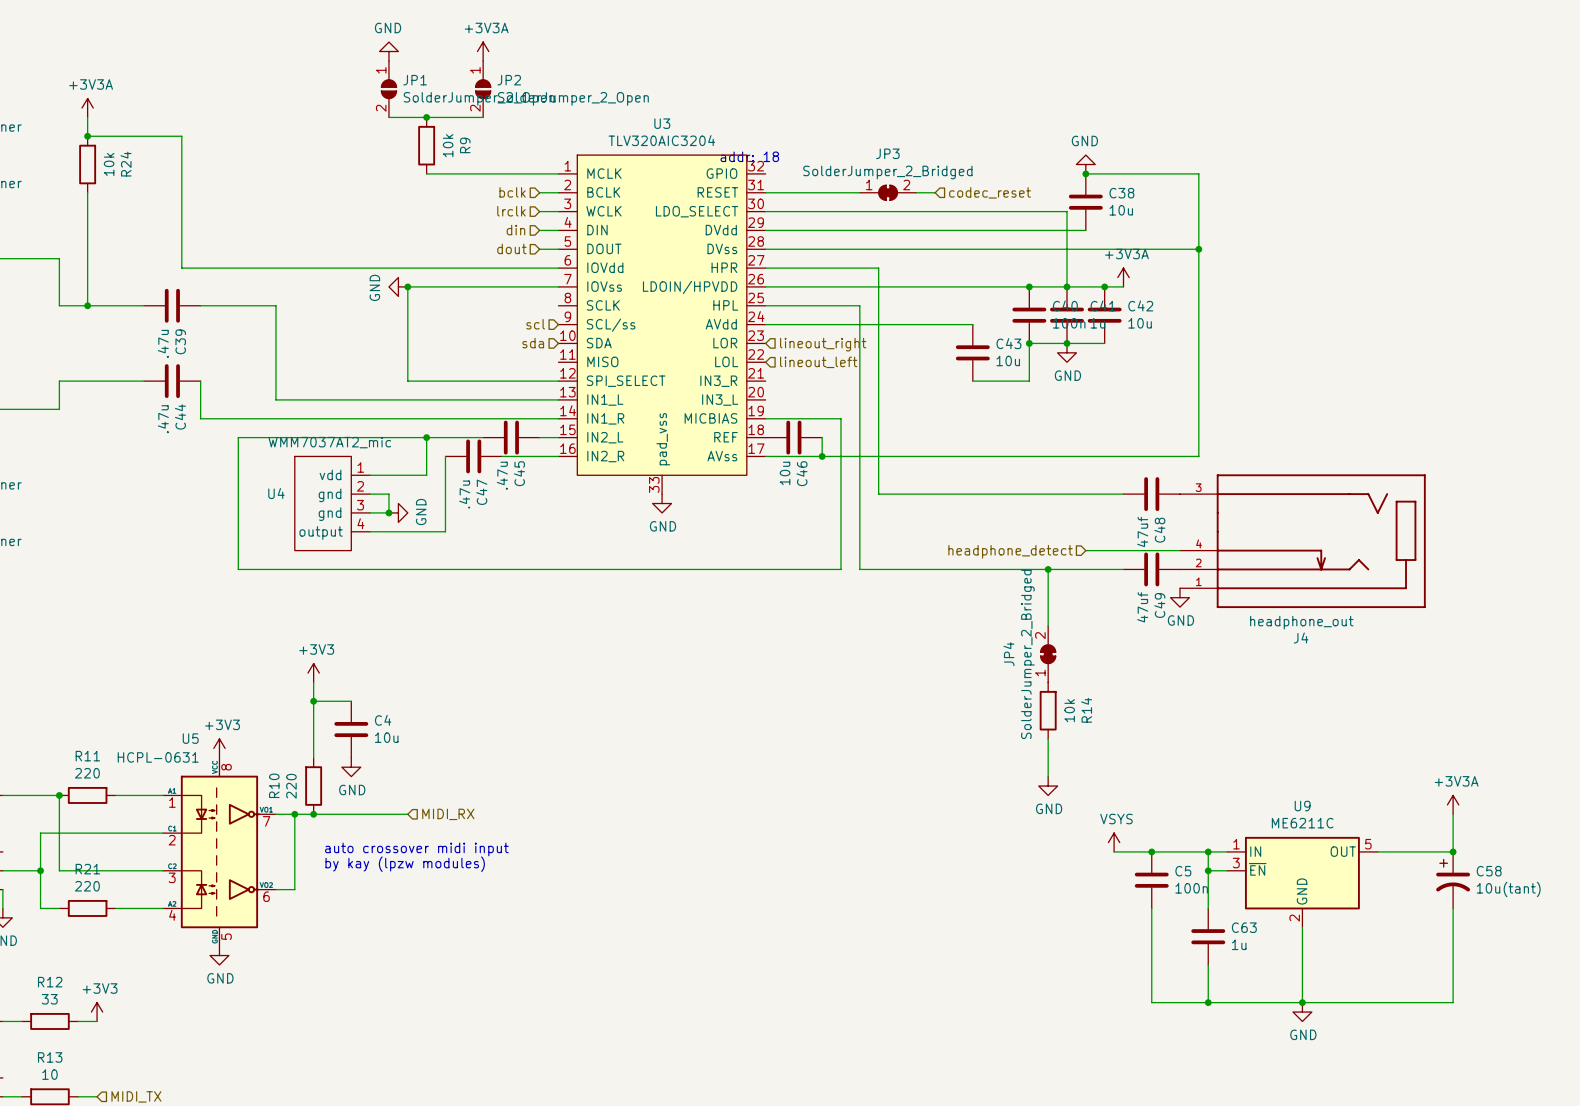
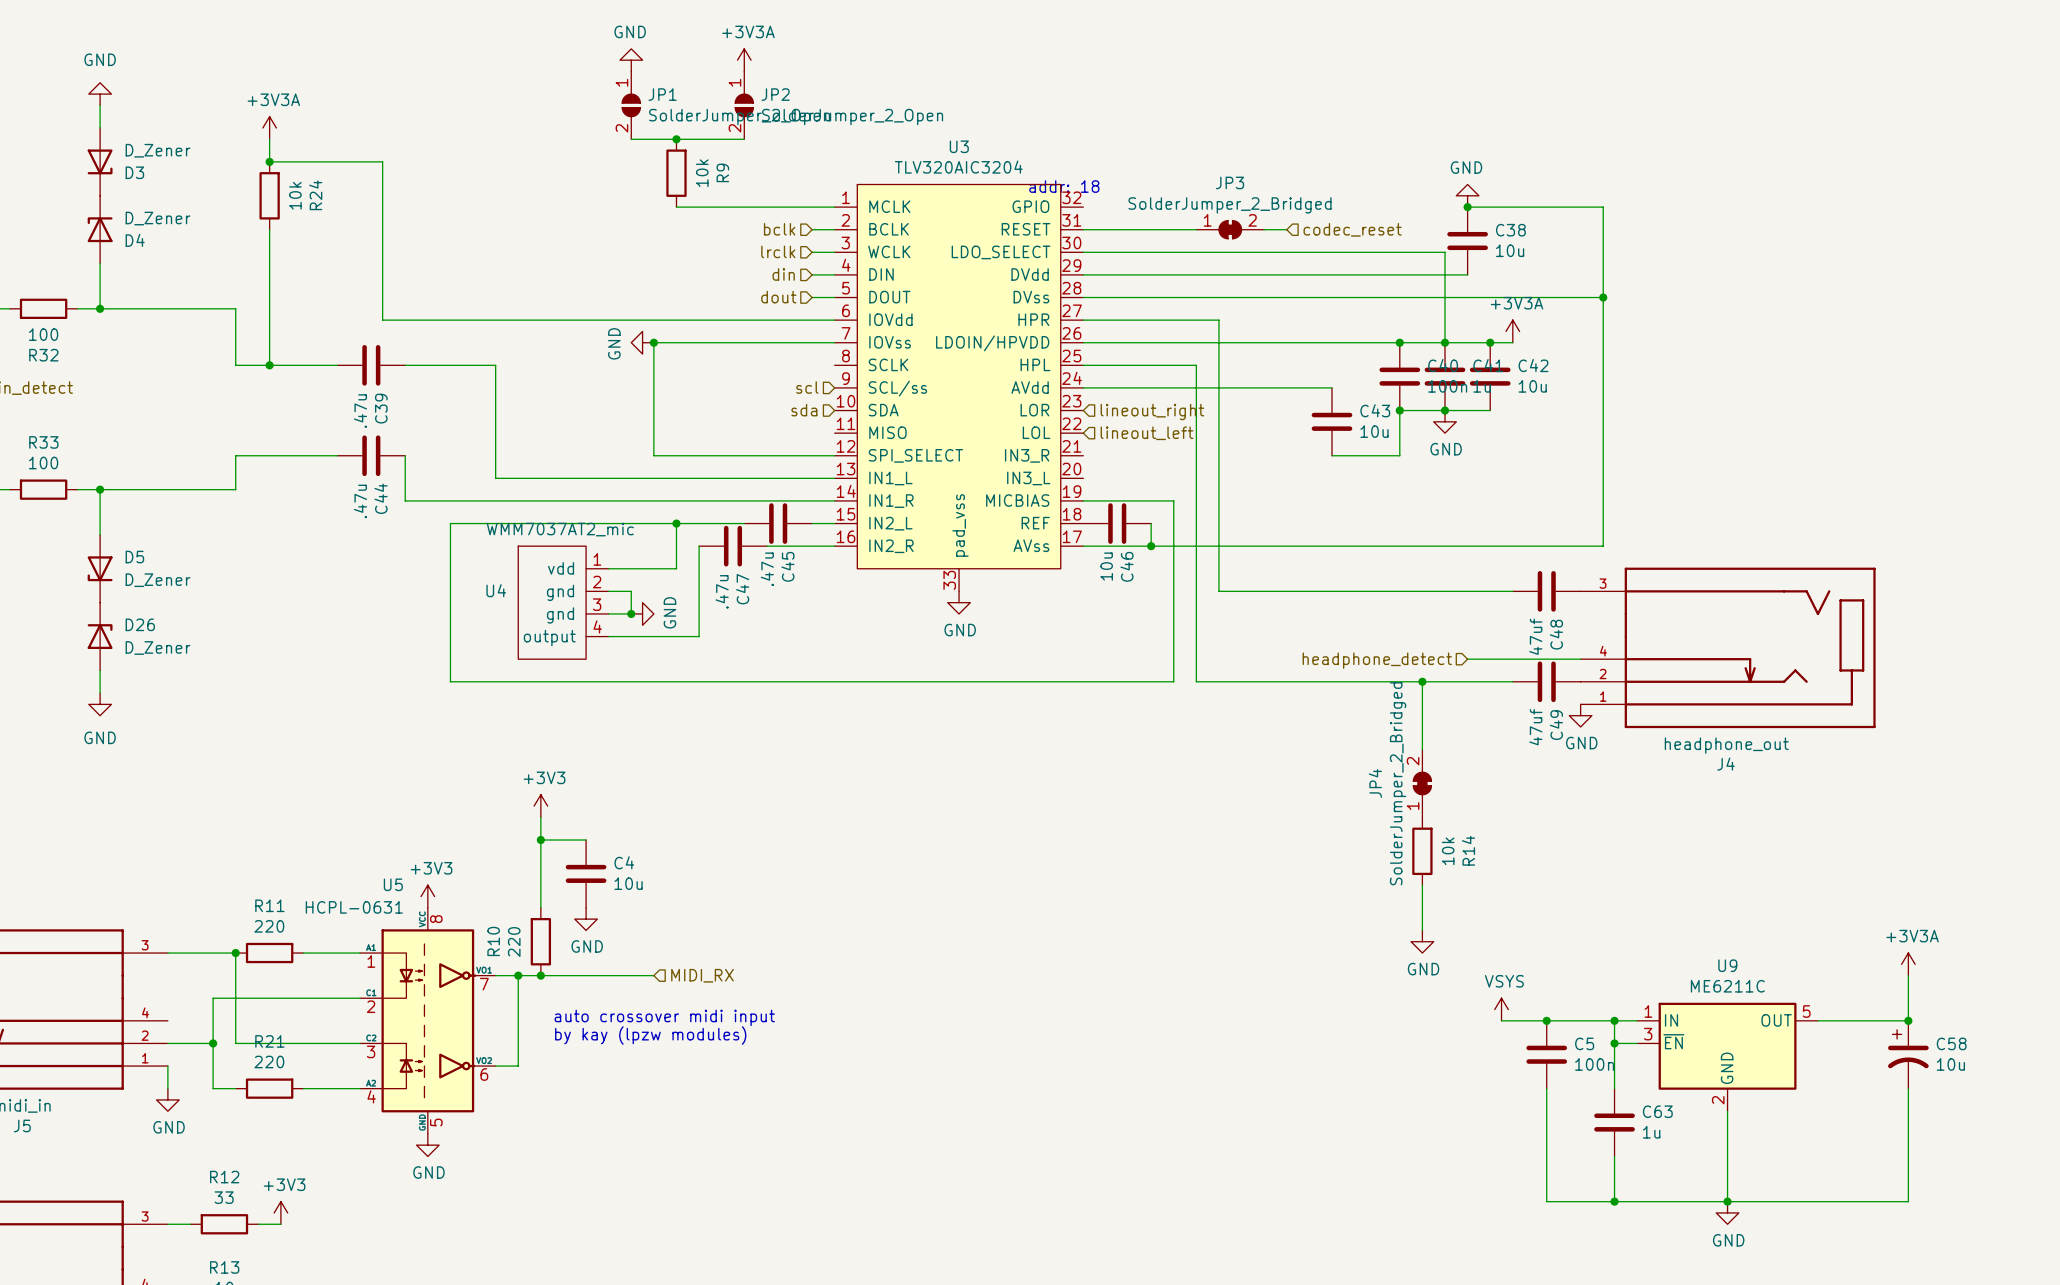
C58 value: 10u(tant) (1508, 889) -> 10u (1950, 1064)

